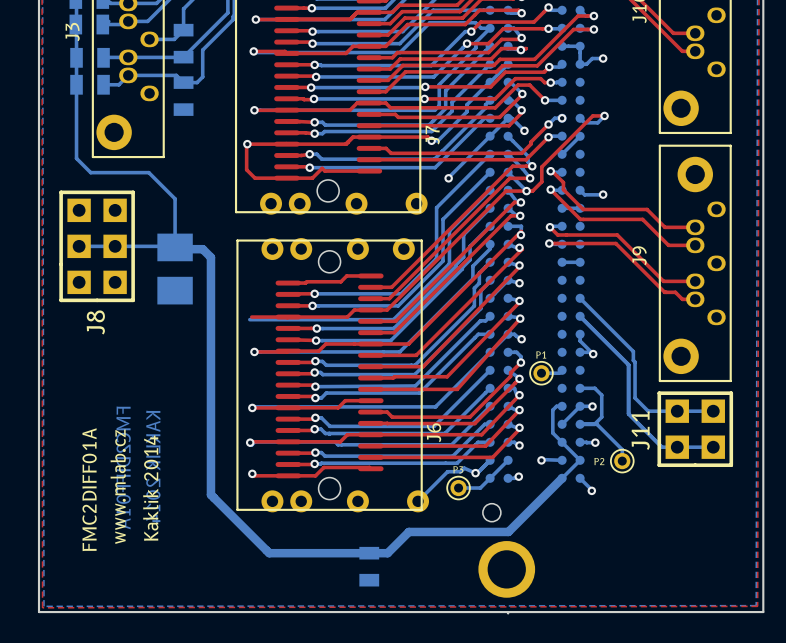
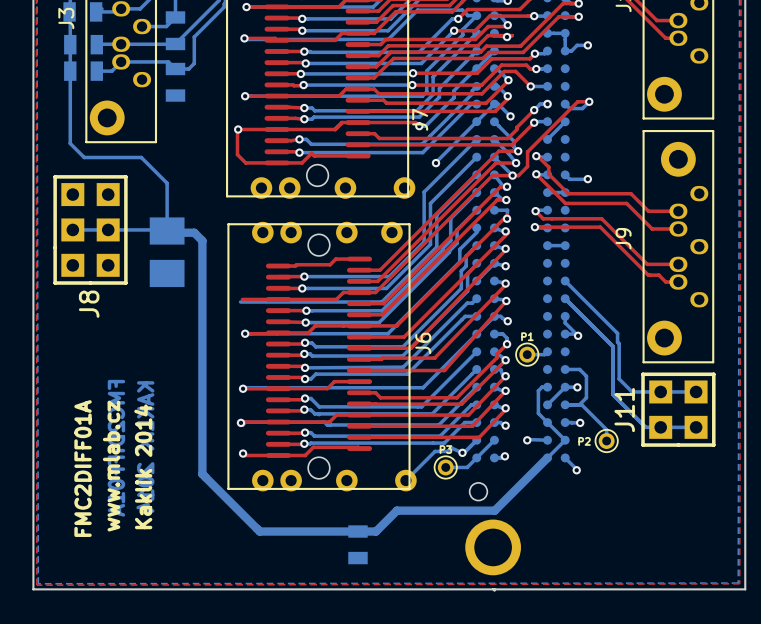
J6 name position: J6 (434, 432) -> J6 (423, 343)

